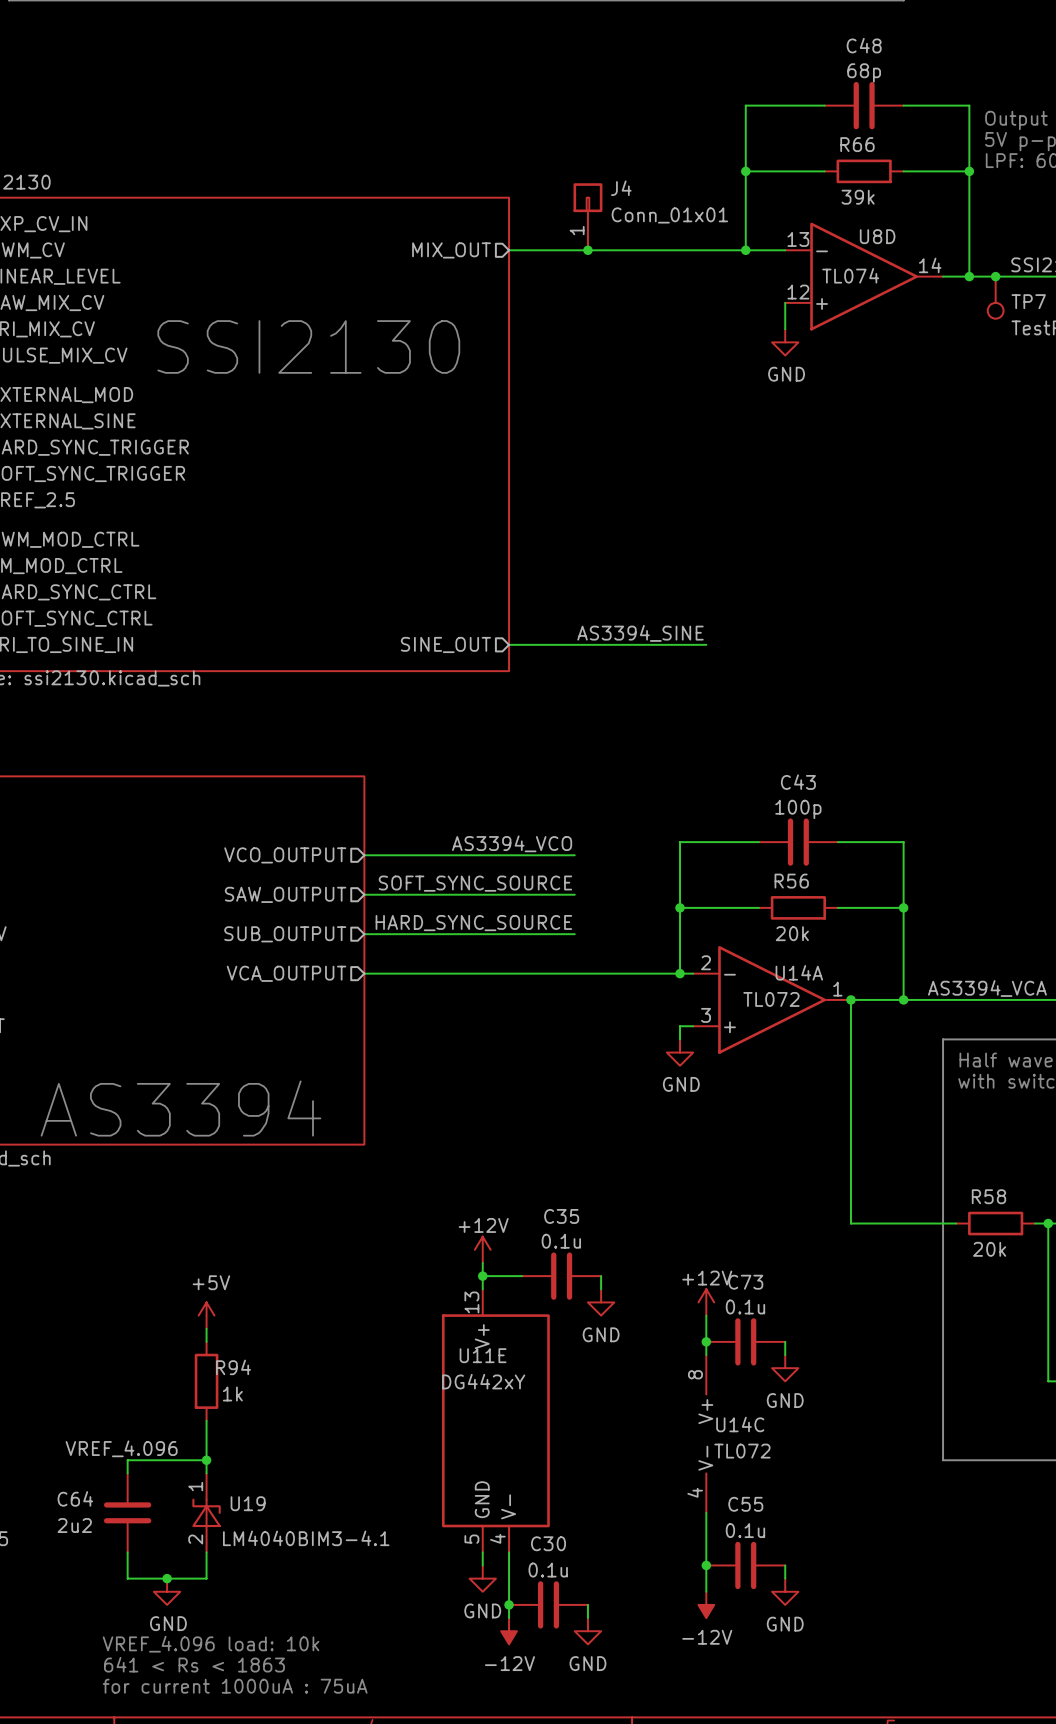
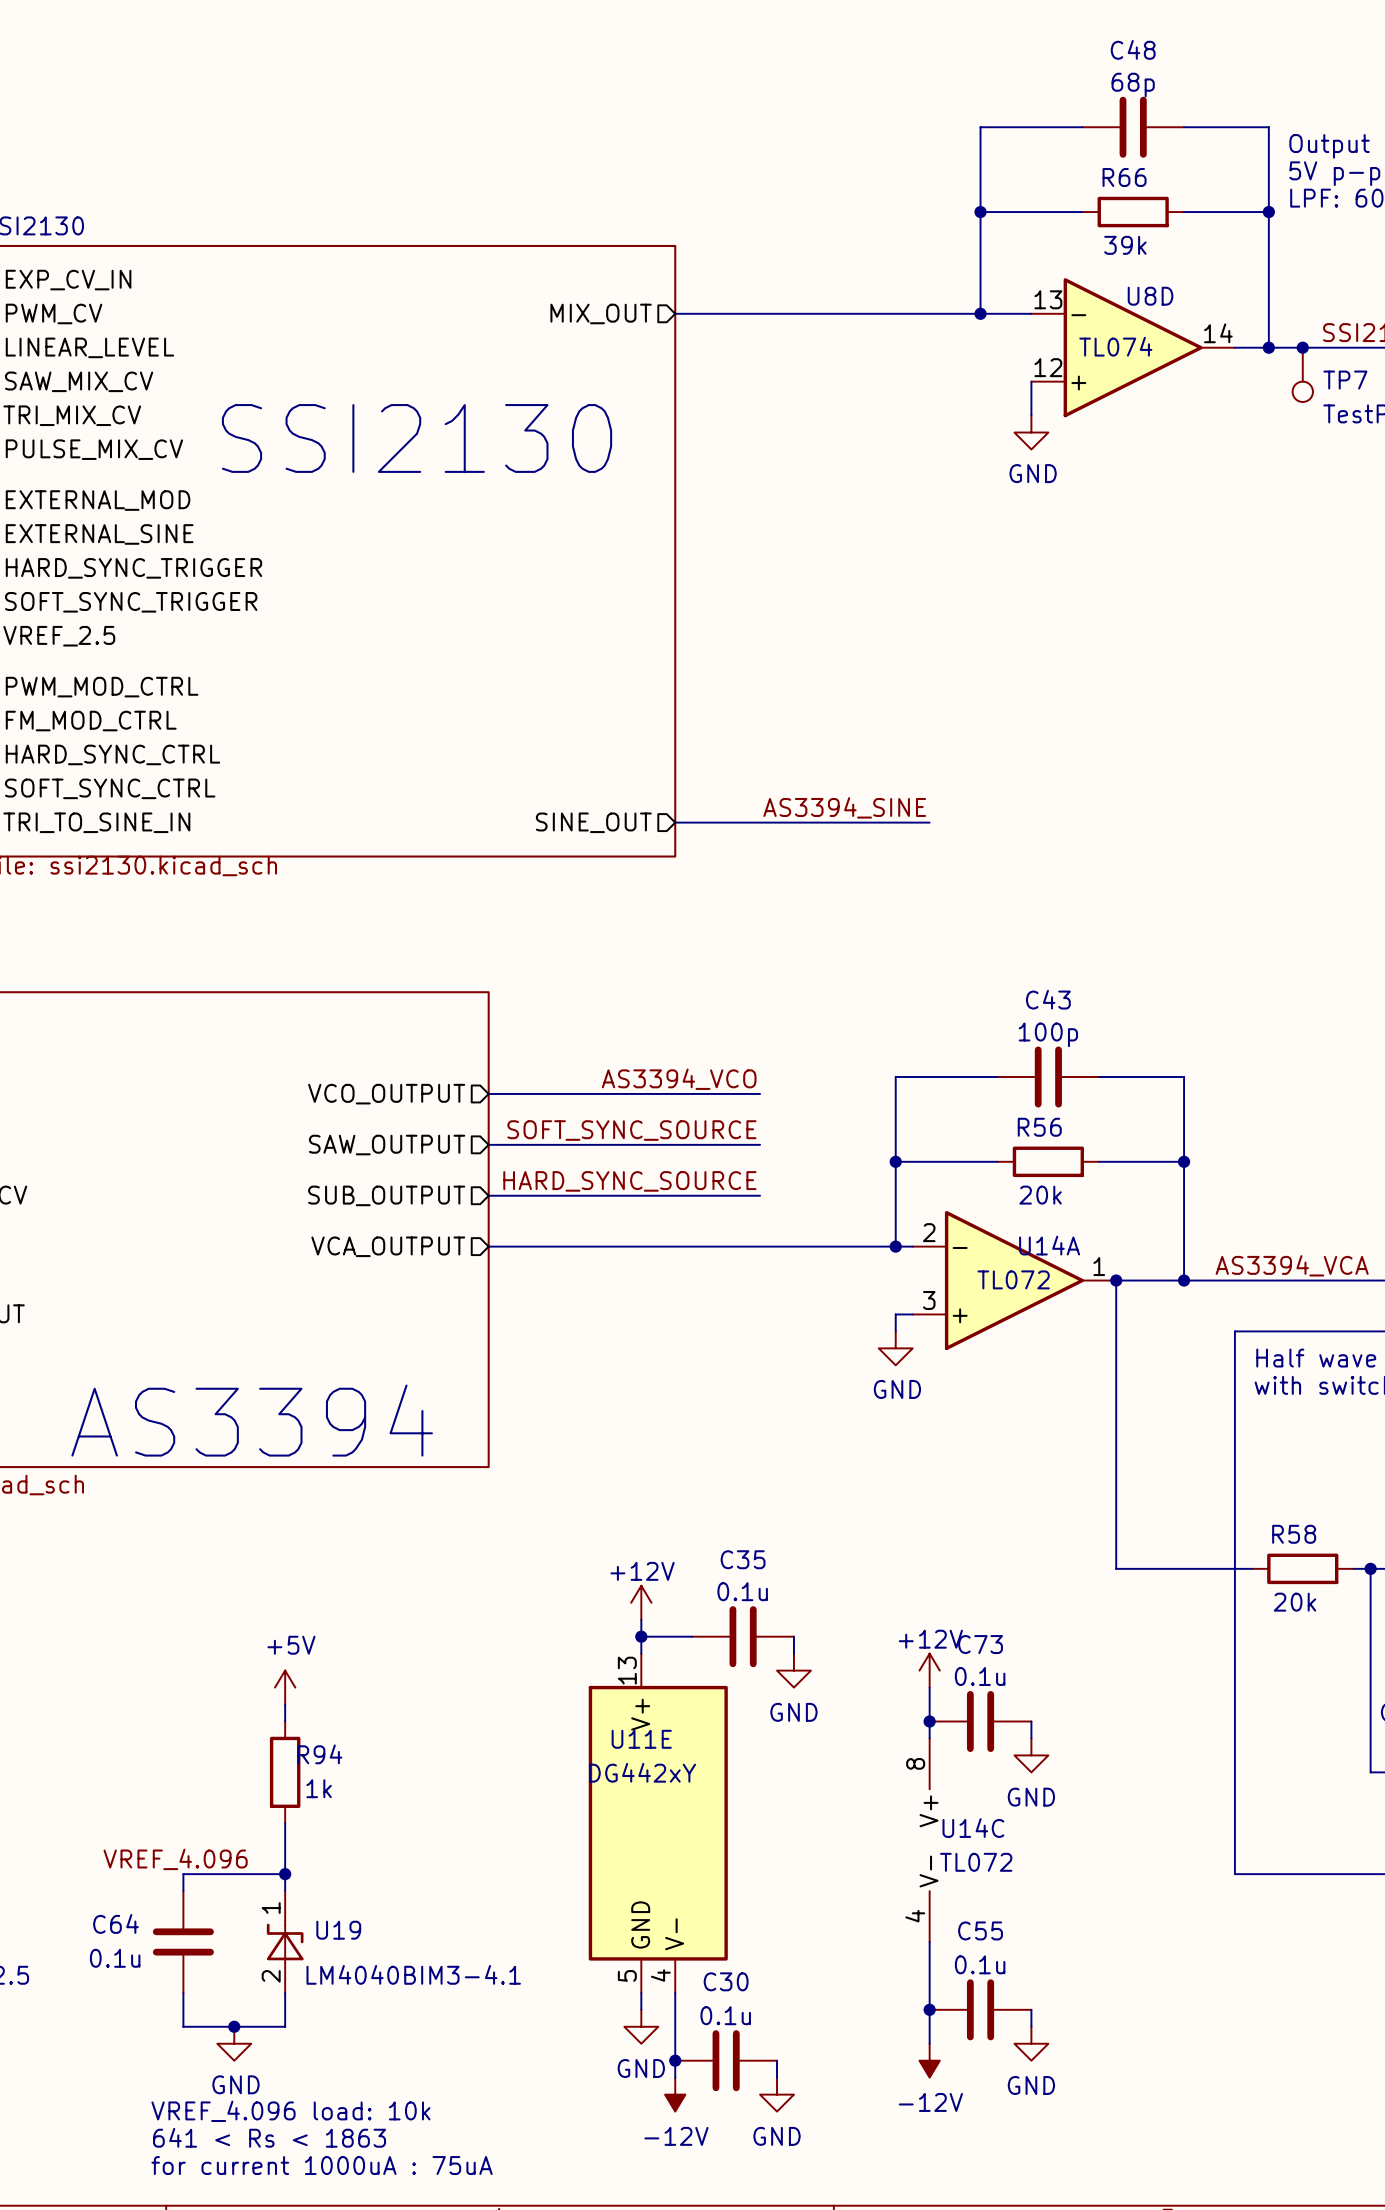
J4: Conn_01x01 (587, 216) -> none
junction: (587, 250) -> none
C64 value: 2u2 (74, 1525) -> 0.1u (115, 1958)

